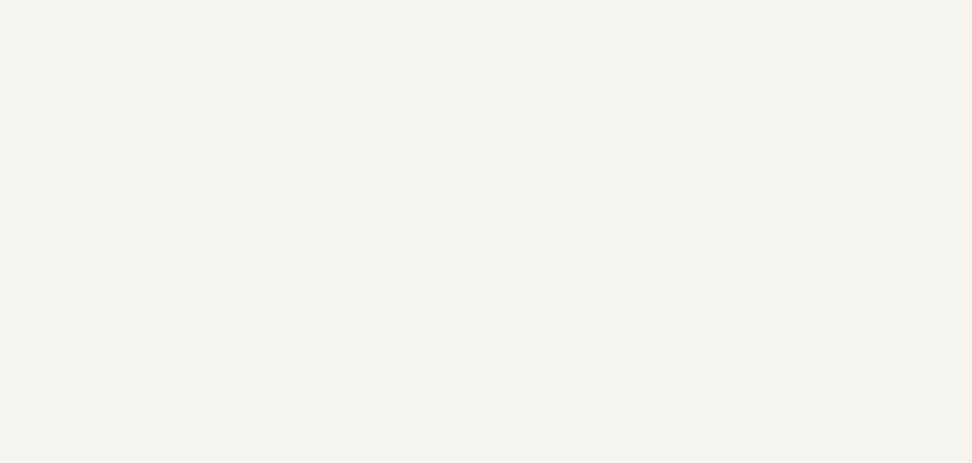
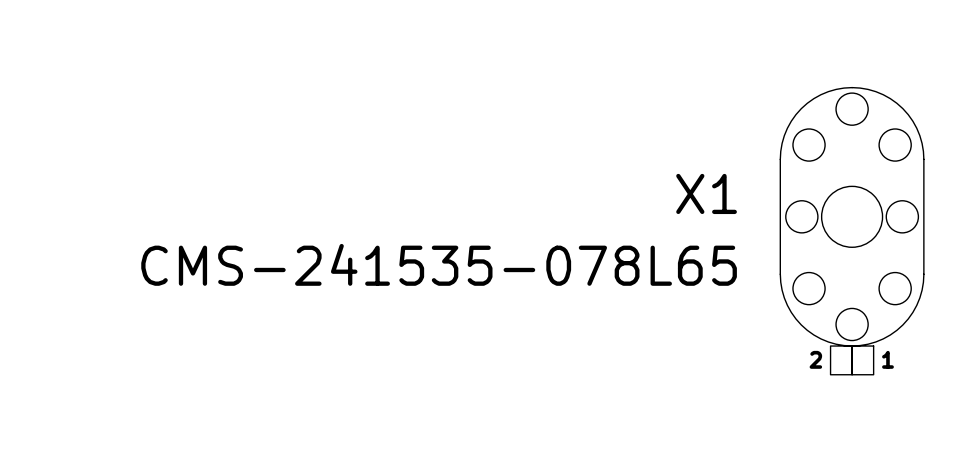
X1: none -> CMS-241535-078L65 (852, 231)

